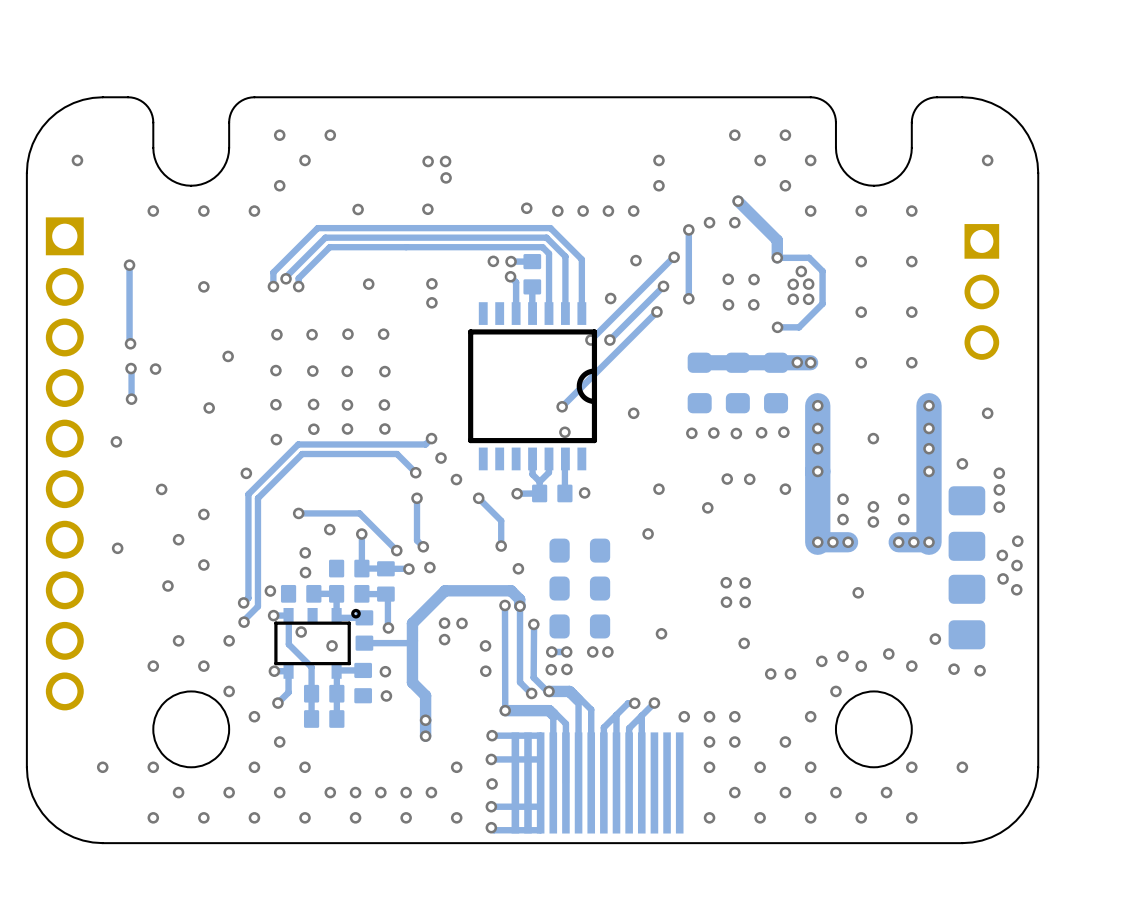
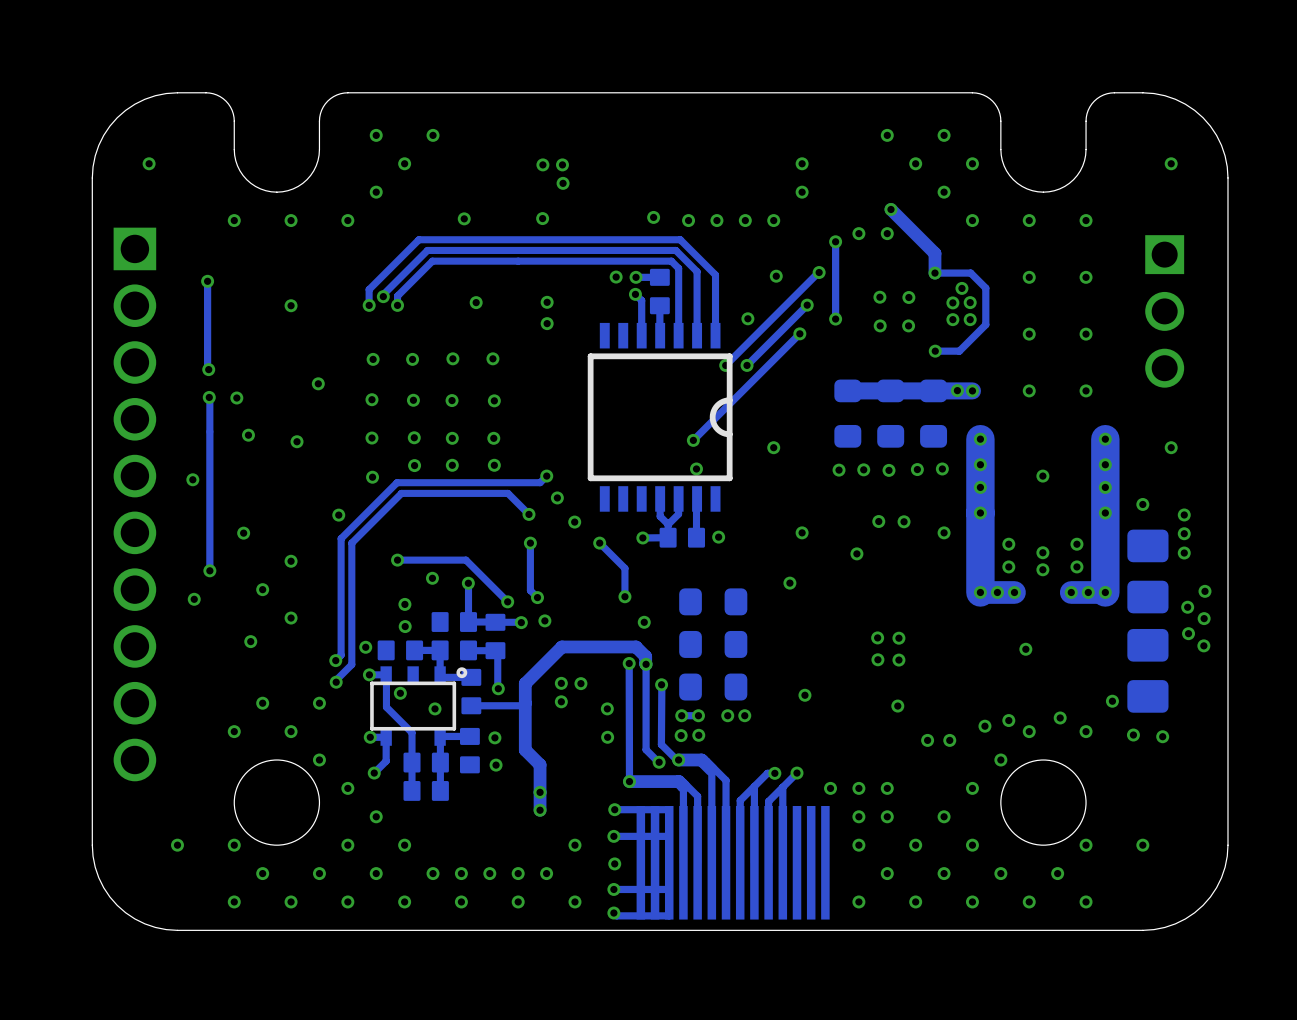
track: none -> (209, 431) (209, 570)
via position: (131, 399) -> (248, 435)
via: none -> (209, 570)

